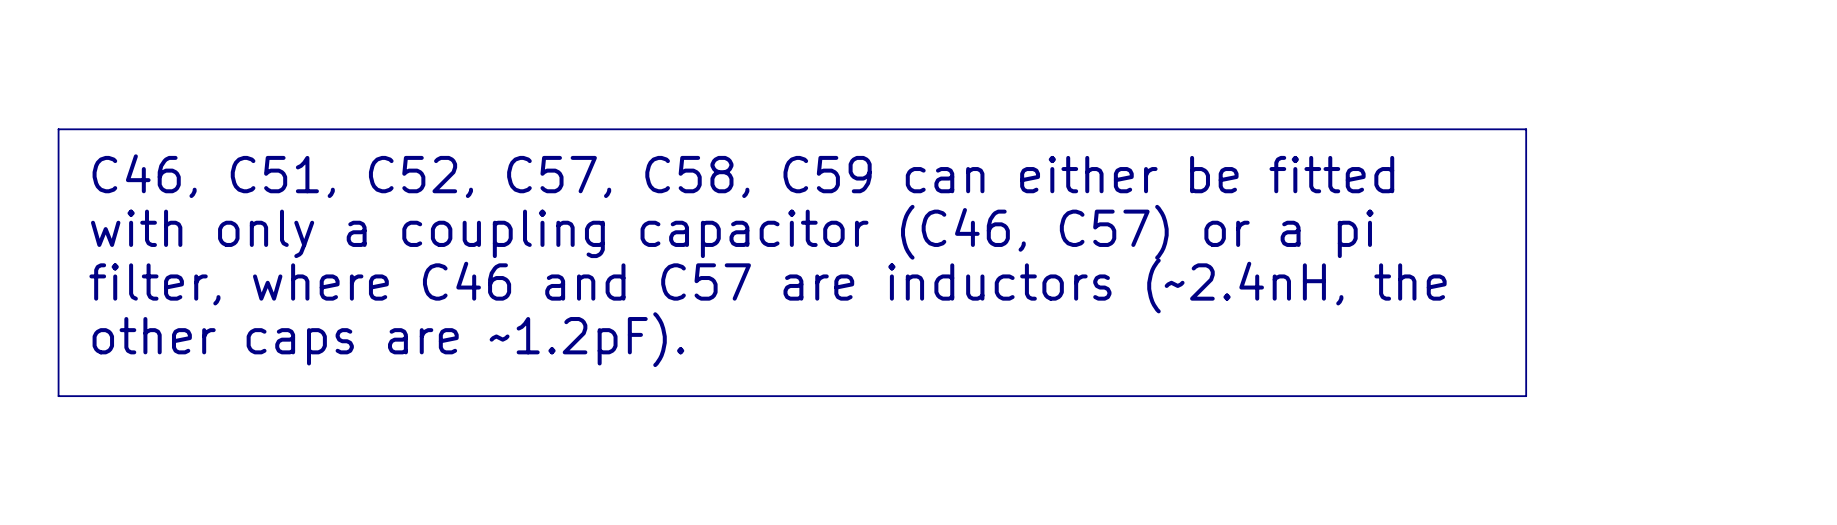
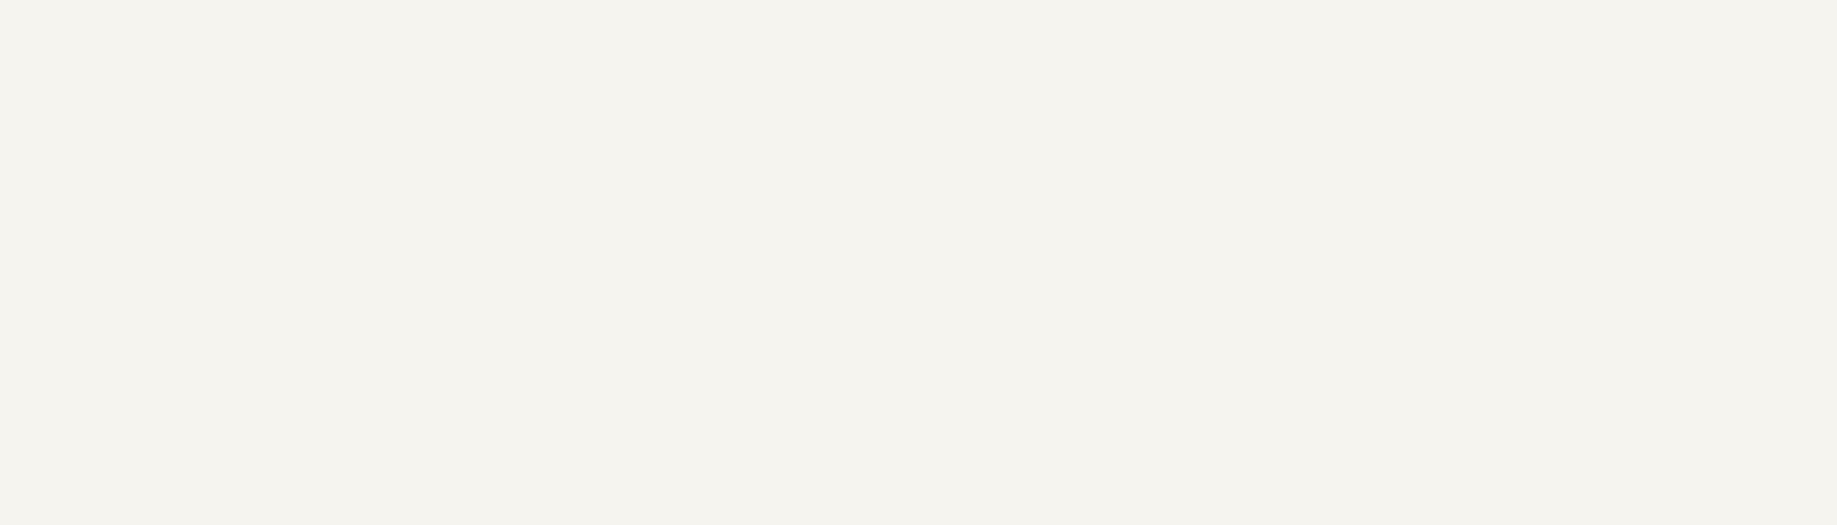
line: (58, 129) (1526, 129) (1526, 396) (58, 396) (58, 129) -> none
text: C46, C51, C52, C57, C58, C59 can either be fitted (743, 176) -> none
text: with only a coupling capacitor (C46, C57) or a pi (732, 232) -> none
text: filter, where C46 and C57 are inductors (~2.4nH, the (768, 285) -> none
text: other caps are ~1.2pF). (388, 339) -> none

